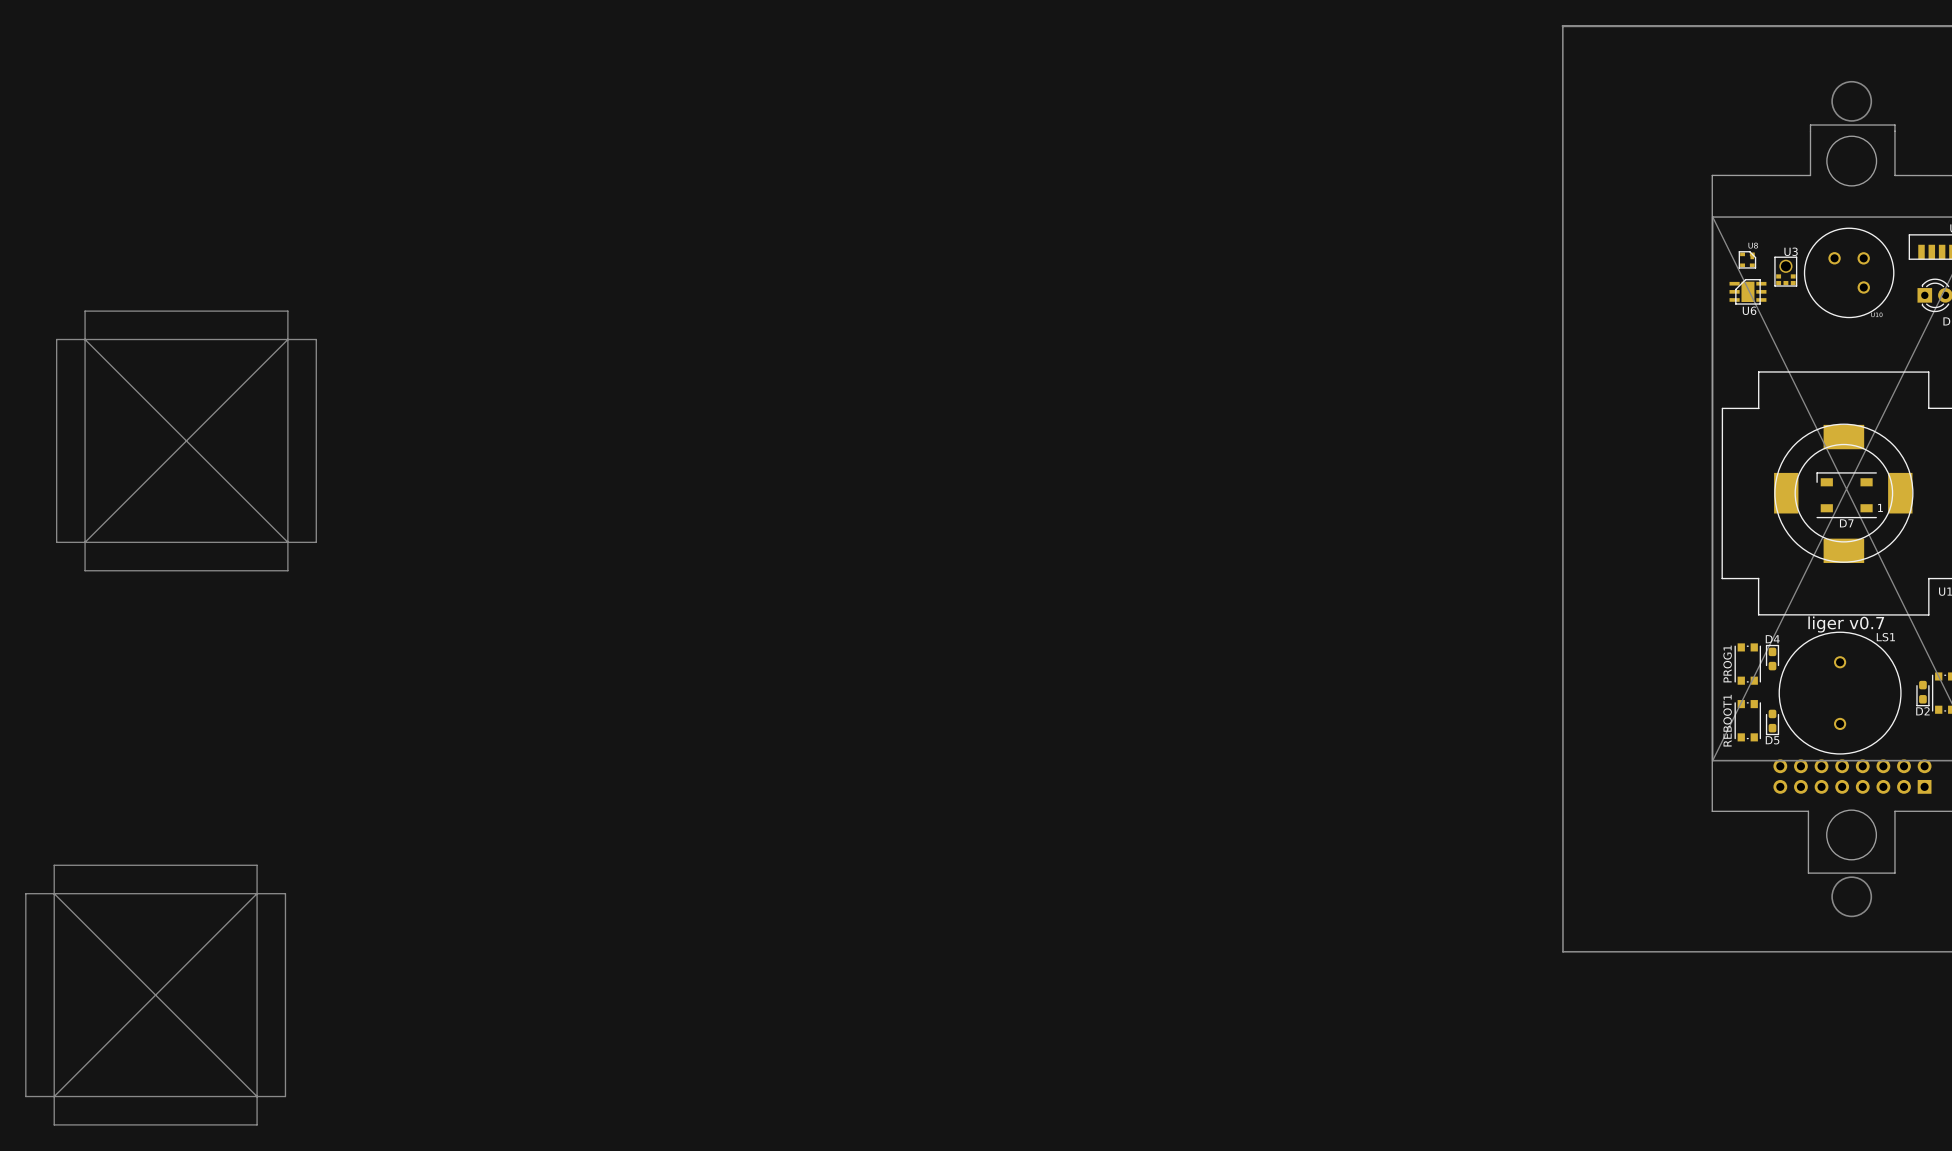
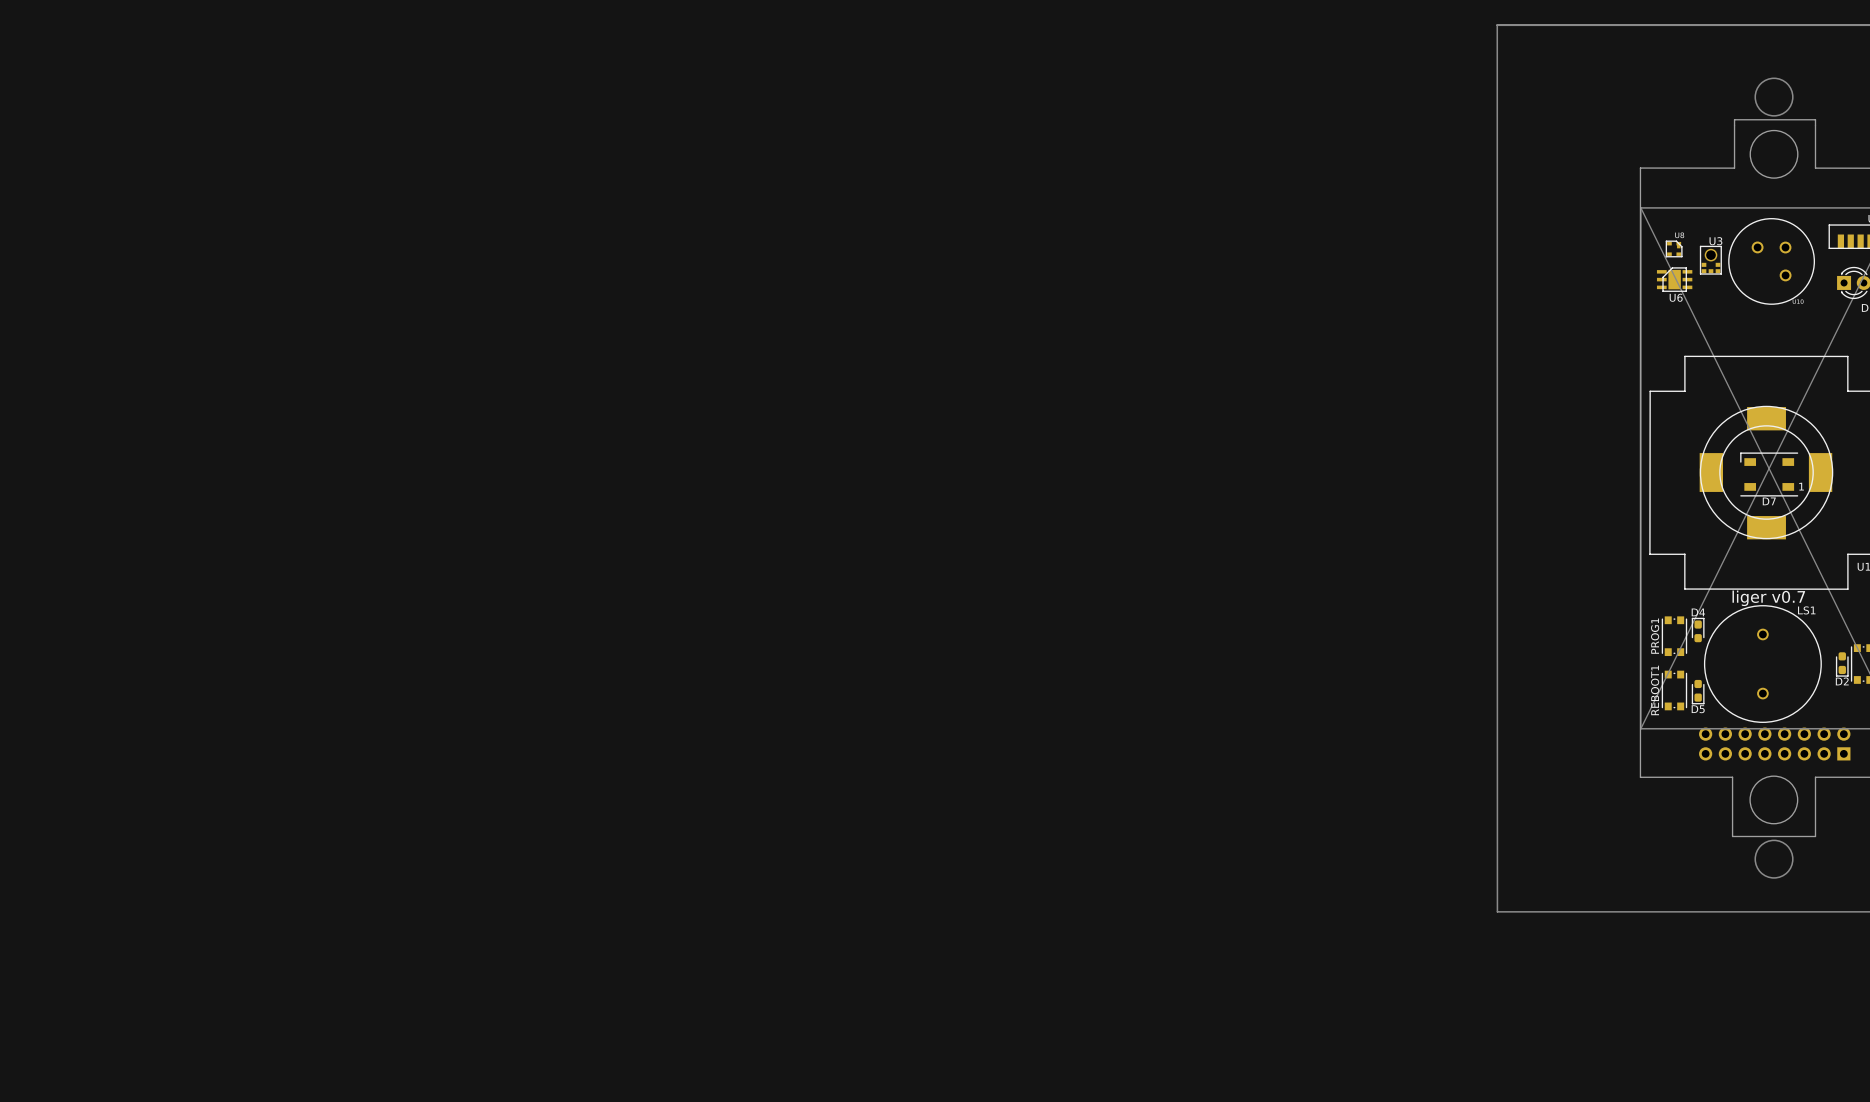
line: (85, 311) (287, 311) (287, 570) (85, 570) (85, 311) -> none
line: (56, 339) (56, 542) (316, 542) (316, 339) (56, 339) -> none
line: (85, 339) (287, 542) -> none
line: (287, 339) (85, 542) -> none
line: (54, 865) (257, 865) (257, 1124) (54, 1124) (54, 865) -> none
line: (25, 893) (285, 893) (285, 1096) (25, 1096) (25, 893) -> none
line: (54, 893) (257, 1096) -> none
line: (257, 893) (54, 1096) -> none

